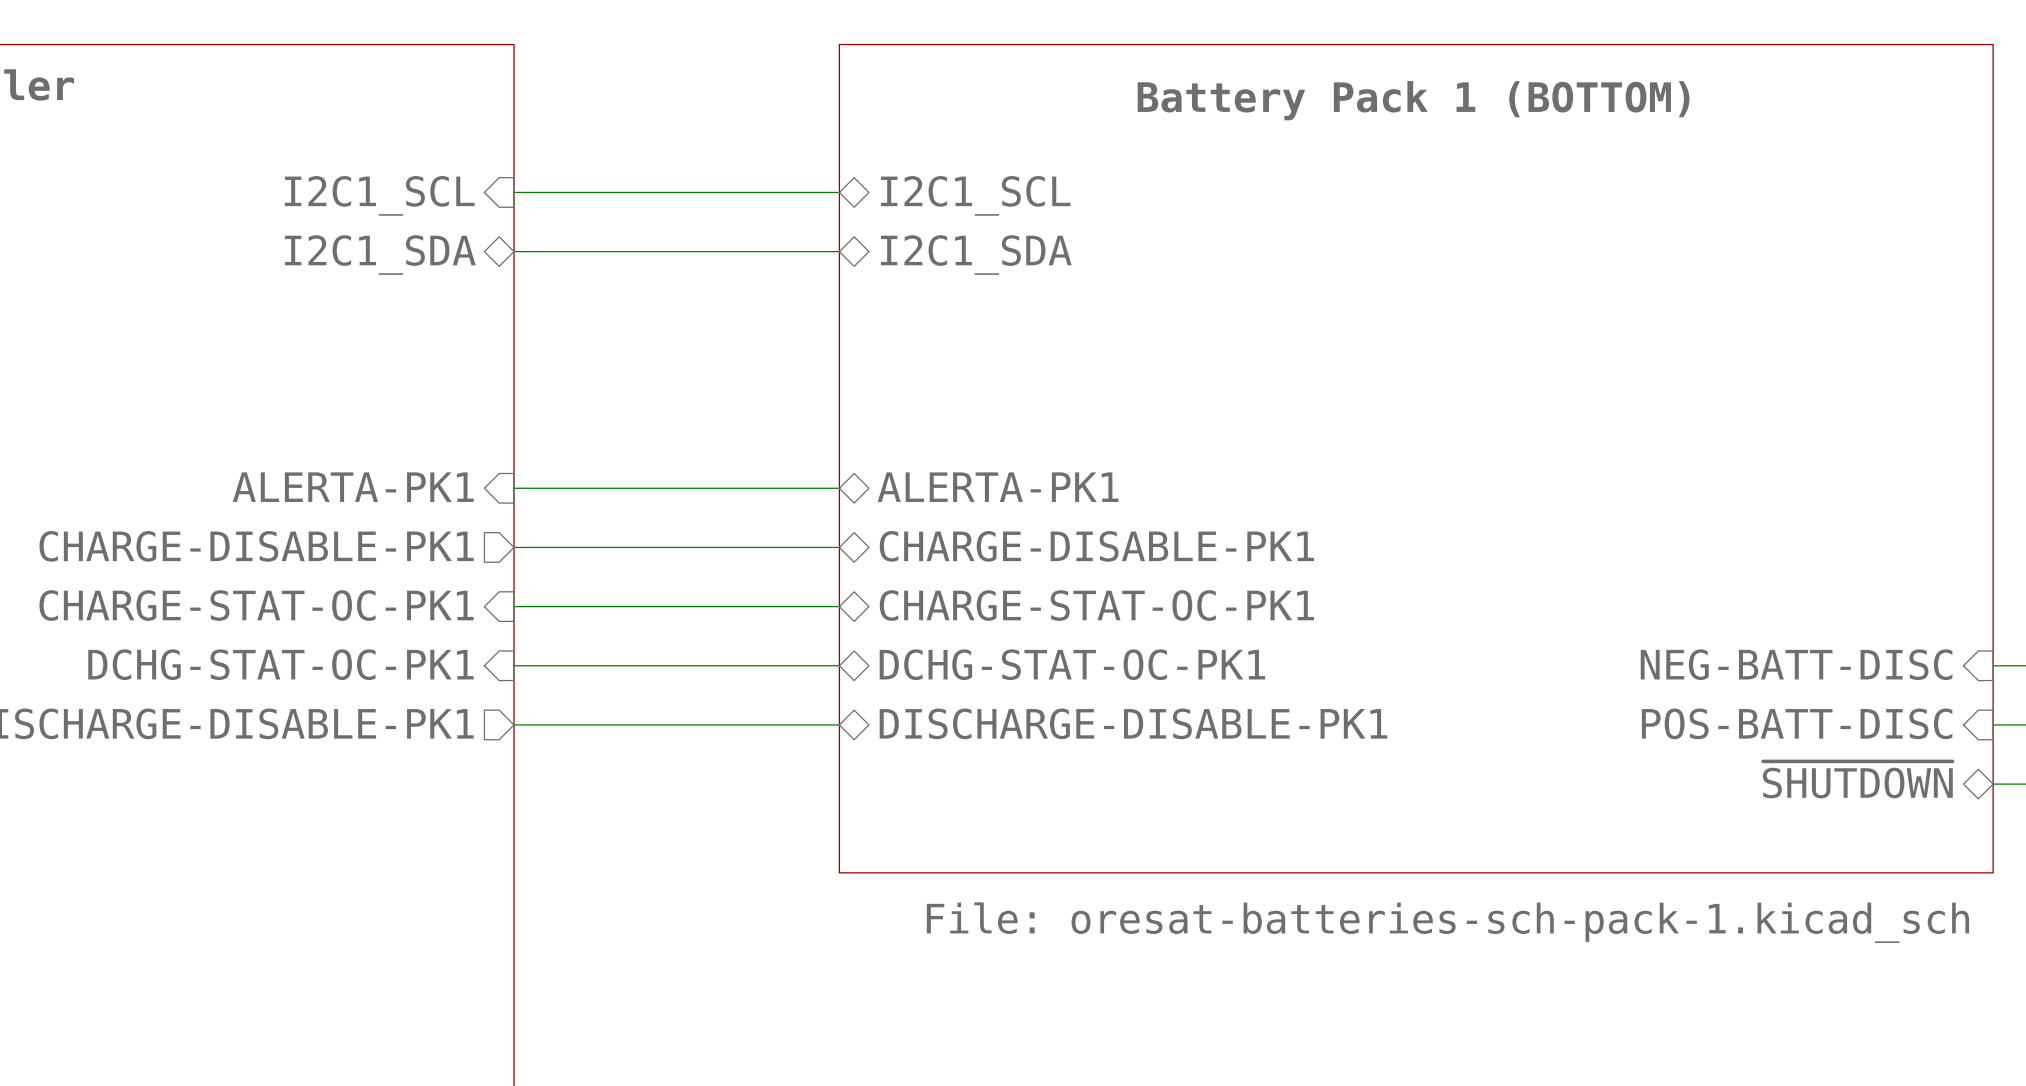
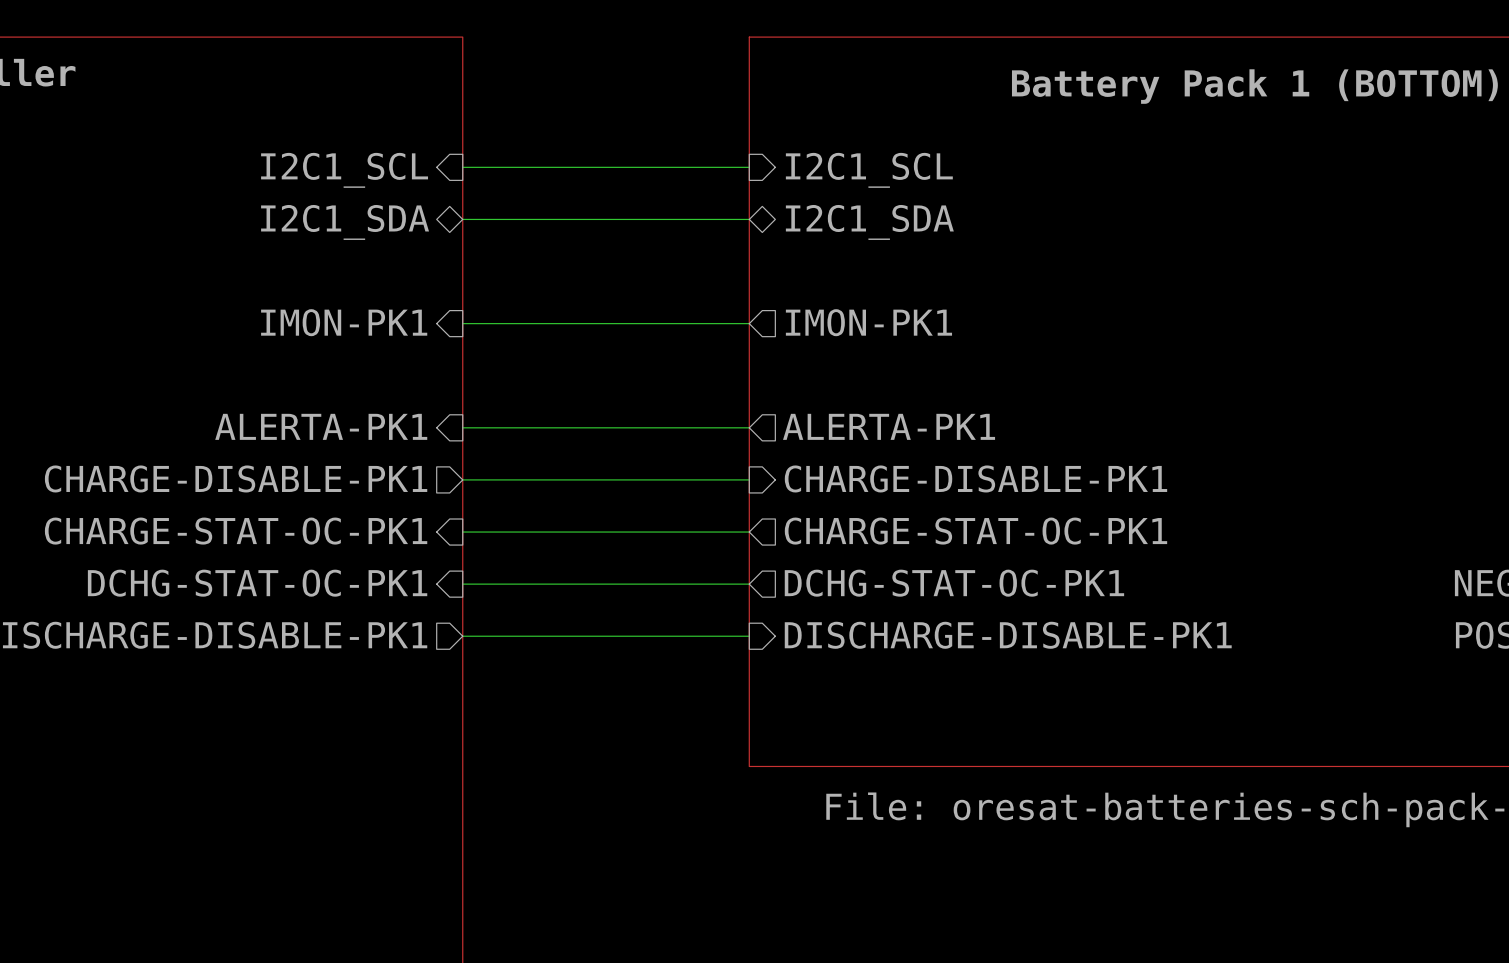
sheet pin shape: bidirectional (975, 195) -> input (869, 170)
sheet pin: none -> IMON-PK1 (344, 322)
sheet pin: none -> IMON-PK1 (868, 322)
wire: none -> (462, 323) (749, 323)
sheet pin shape: bidirectional (998, 487) -> output (889, 426)
sheet pin shape: bidirectional (1096, 546) -> input (975, 478)
sheet pin shape: bidirectional (1096, 605) -> output (975, 531)
sheet pin shape: bidirectional (1072, 664) -> output (954, 583)
sheet pin shape: bidirectional (1133, 723) -> input (1008, 635)

